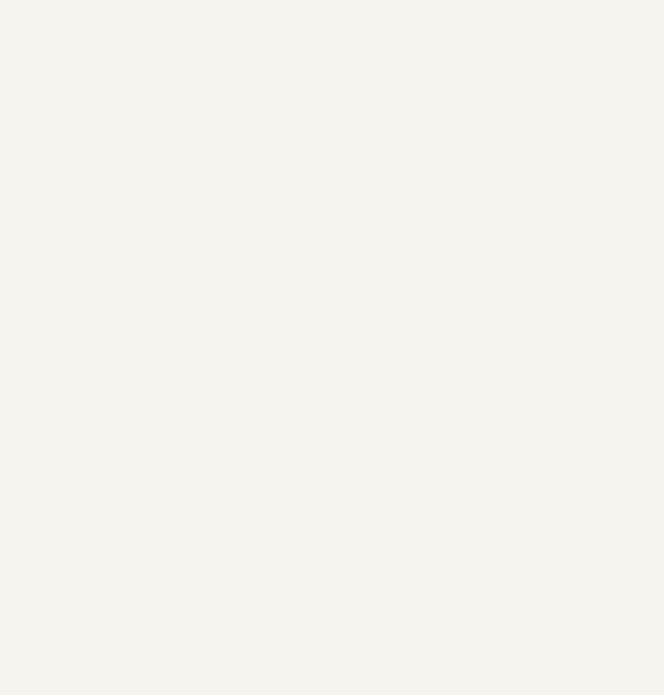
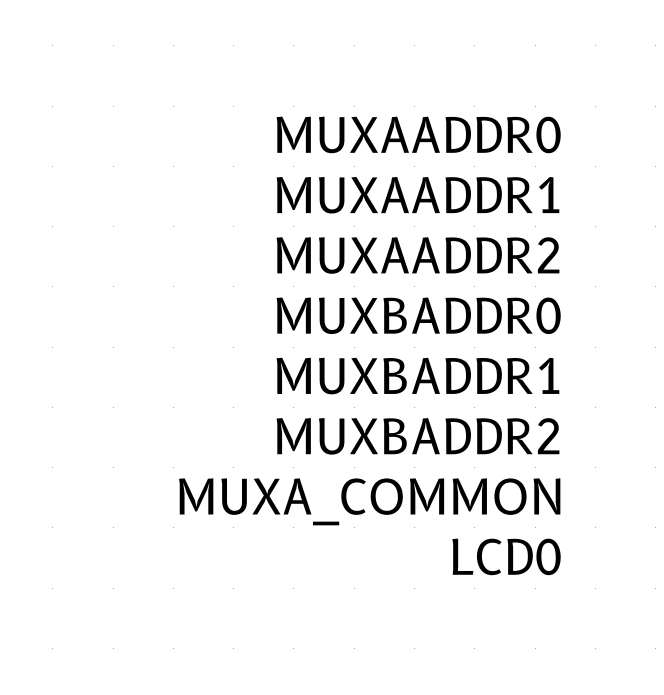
label: none -> MUXAADDR0 (418, 134)
label: none -> MUXAADDR1 (417, 195)
label: none -> MUXAADDR2 (418, 255)
label: none -> MUXBADDR0 (418, 315)
label: none -> MUXBADDR1 (417, 376)
label: none -> MUXBADDR2 (418, 436)
label: none -> MUXA_COMMON (369, 501)
label: none -> LCD0 (506, 556)

